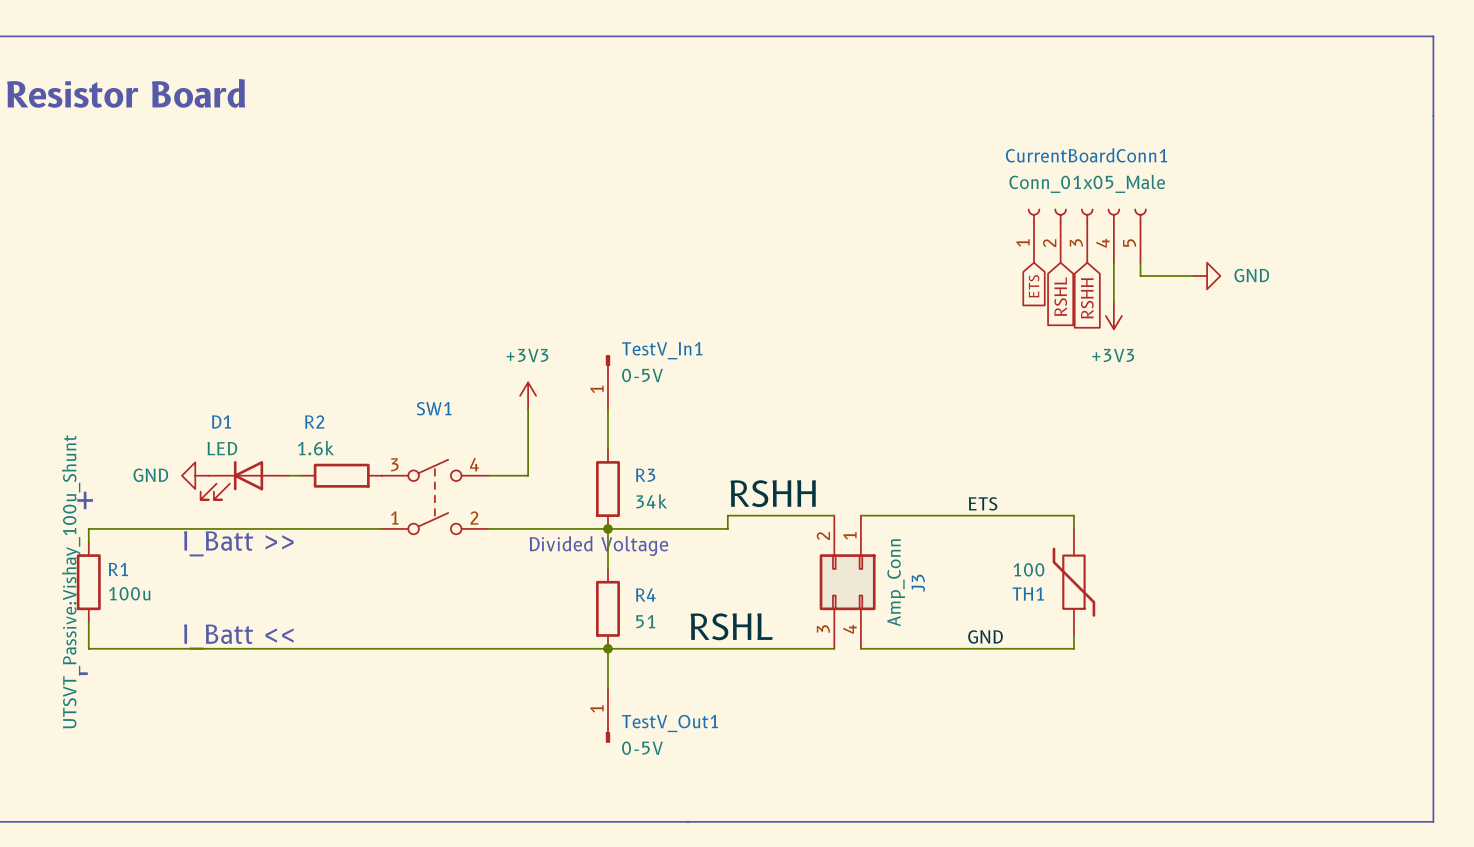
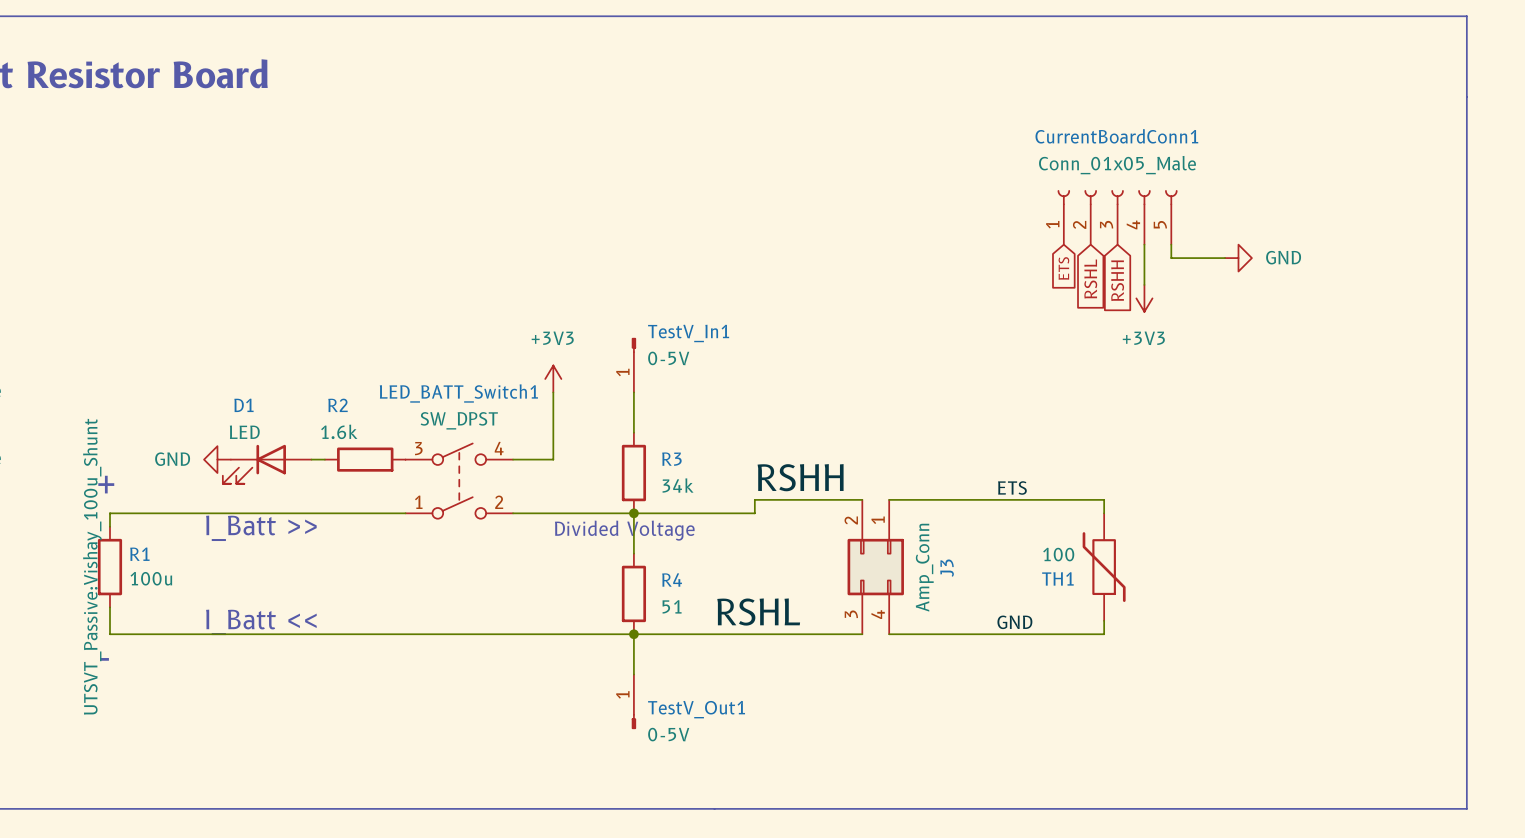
SW1 name: SW1 (434, 408) -> LED_BATT_Switch1 (458, 393)
SW1 value: none -> SW_DPST (459, 420)

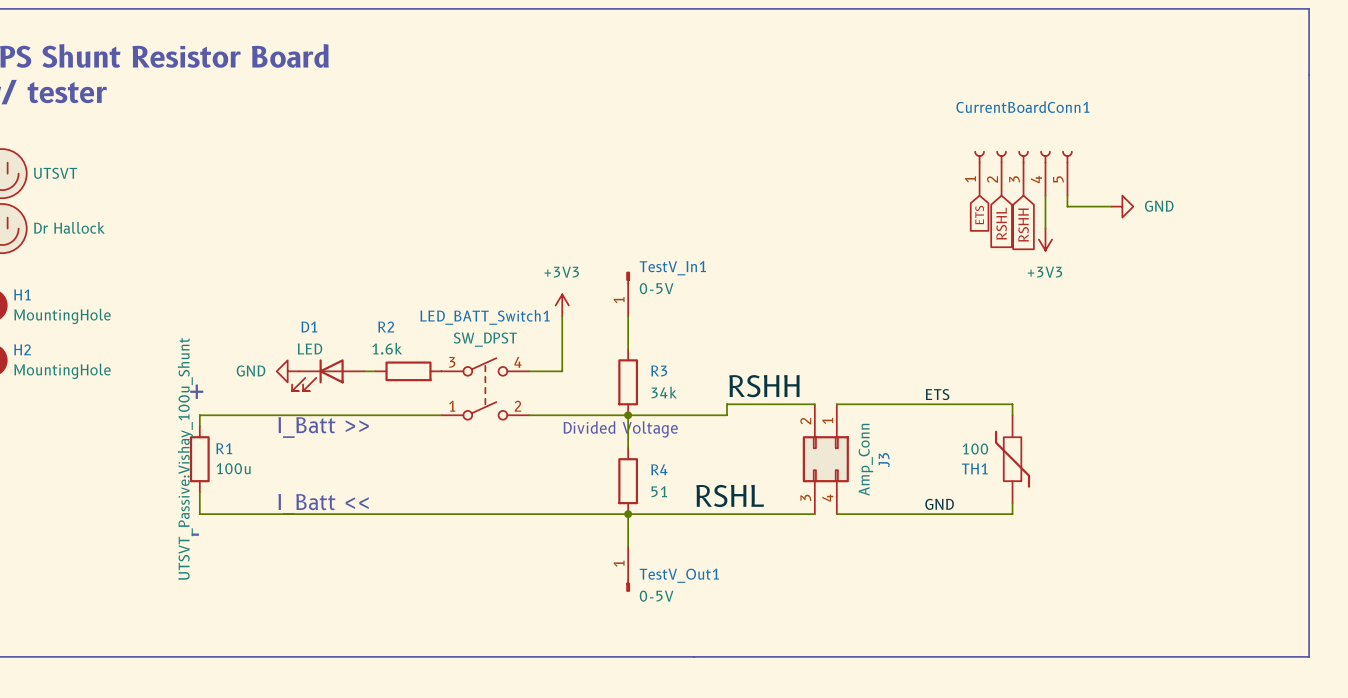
CurrentBoardConn1 value: Conn_01x05_Male (1117, 165) -> none

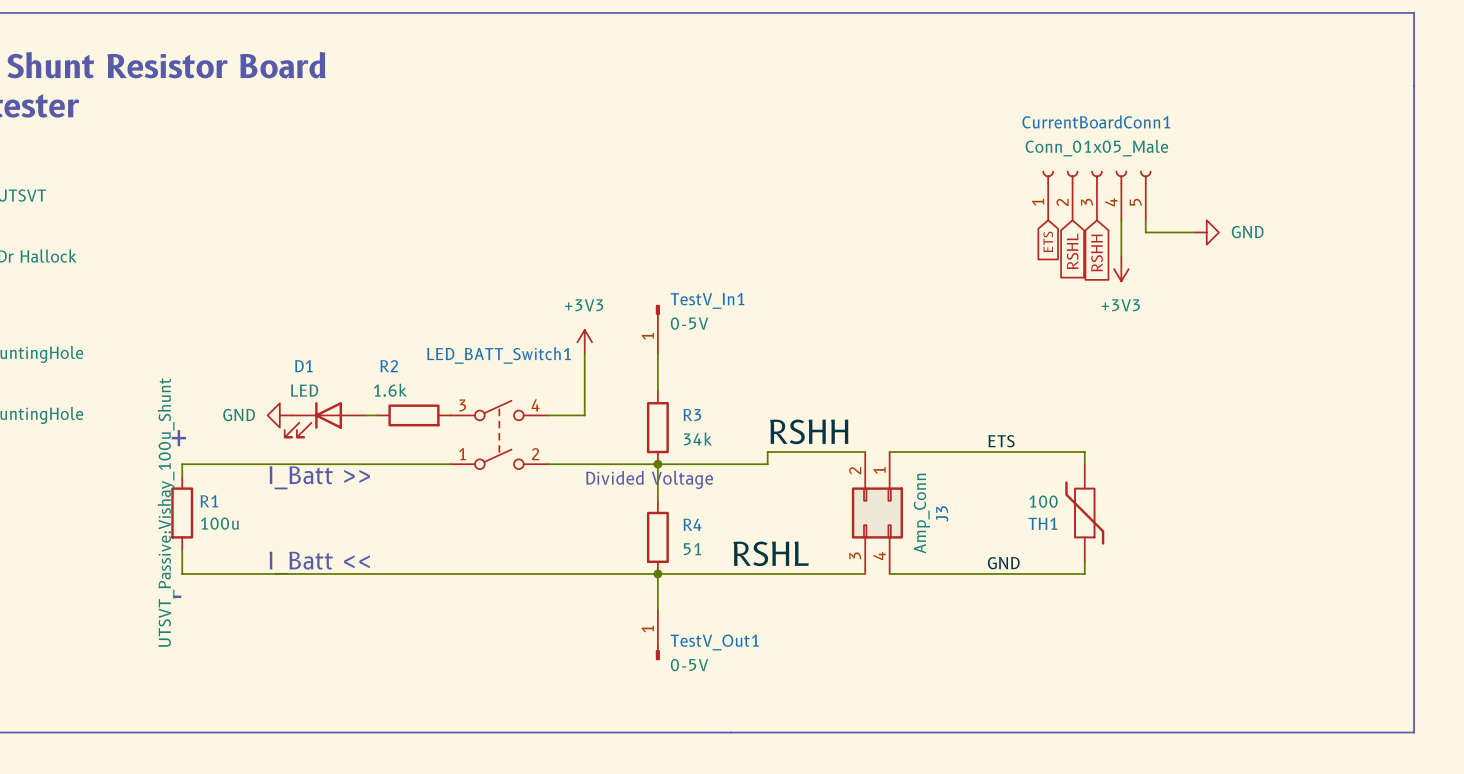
CurrentBoardConn1 value: none -> Conn_01x05_Male (1096, 148)
LED_BATT_Switch1 value: SW_DPST (485, 339) -> none

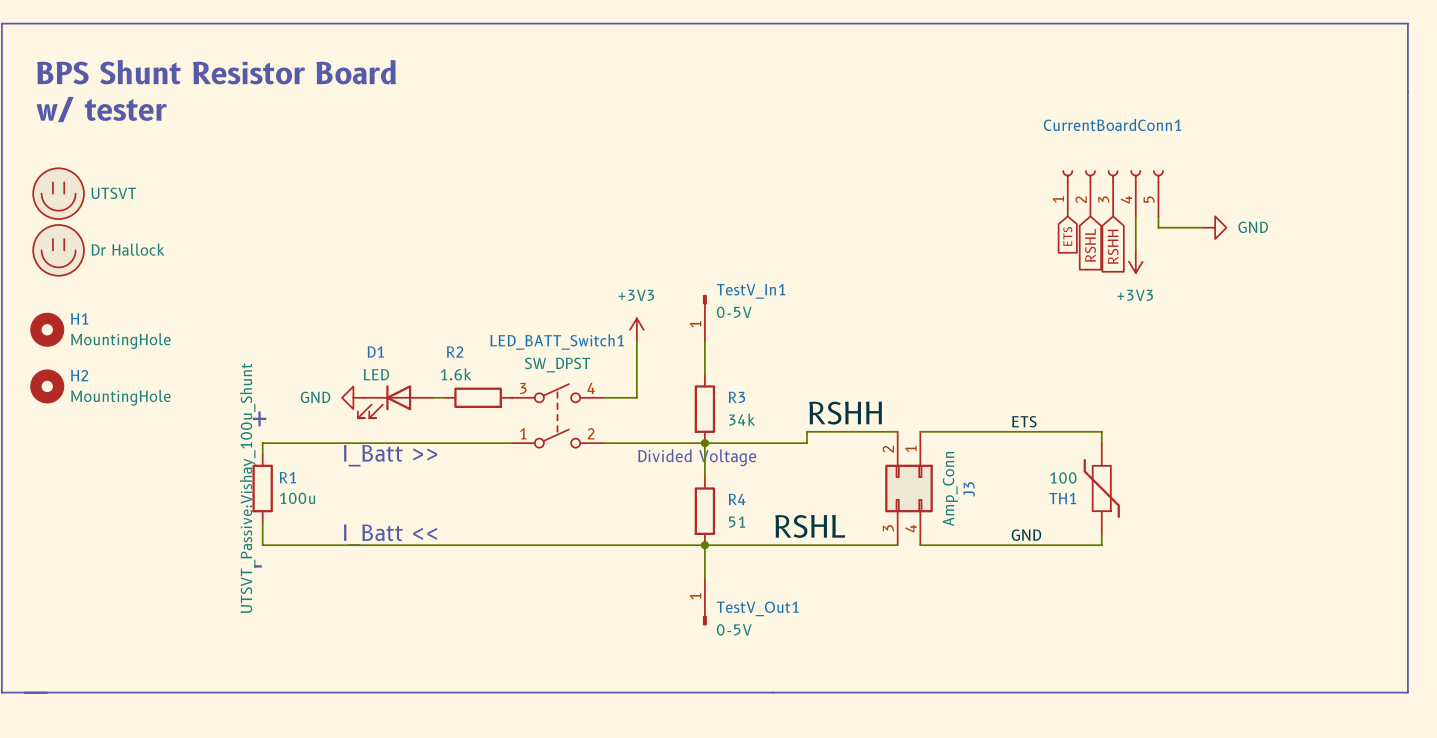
CurrentBoardConn1 value: Conn_01x05_Male (1096, 148) -> none
LED_BATT_Switch1 value: none -> SW_DPST (557, 365)

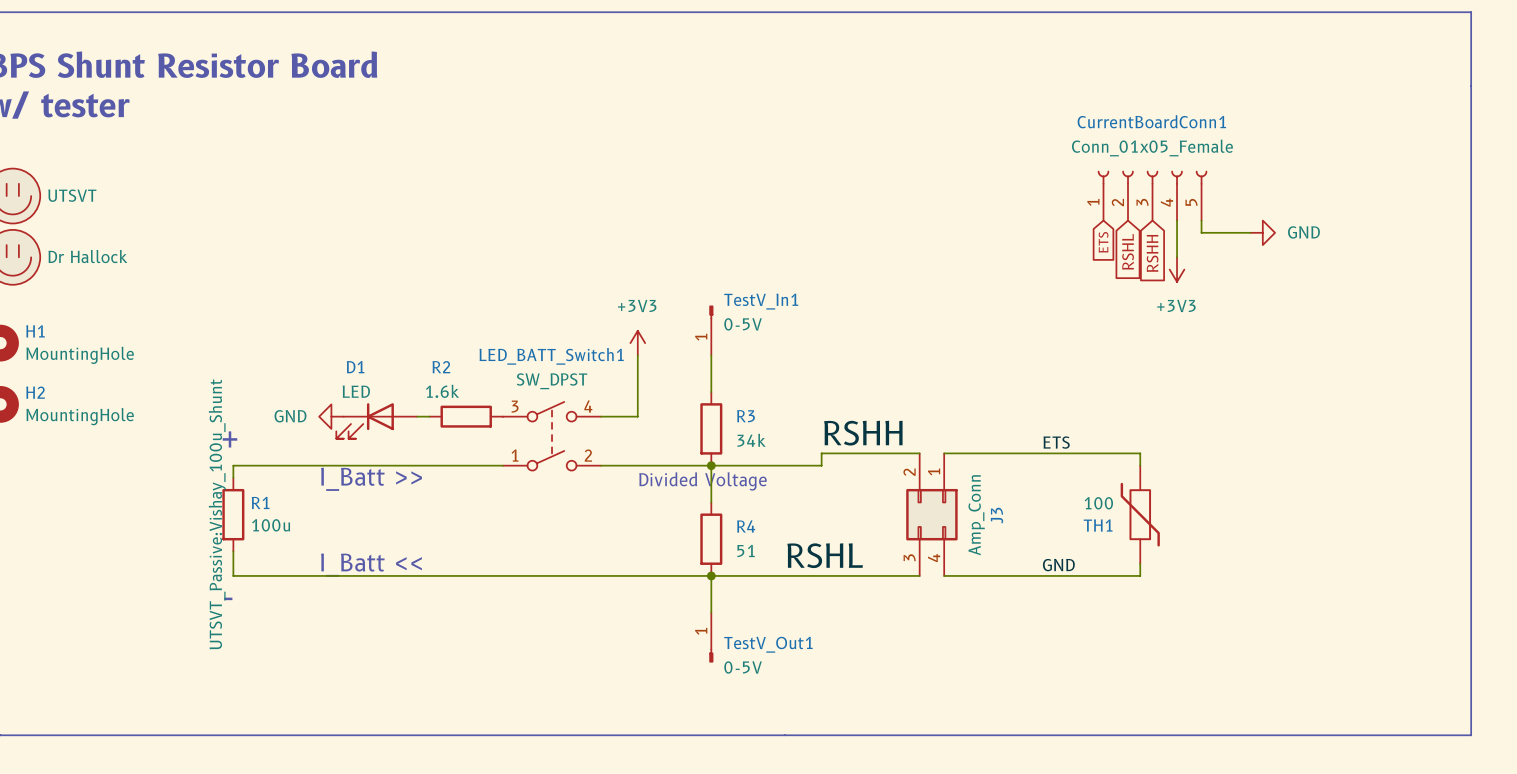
CurrentBoardConn1 value: none -> Conn_01x05_Female (1152, 148)

